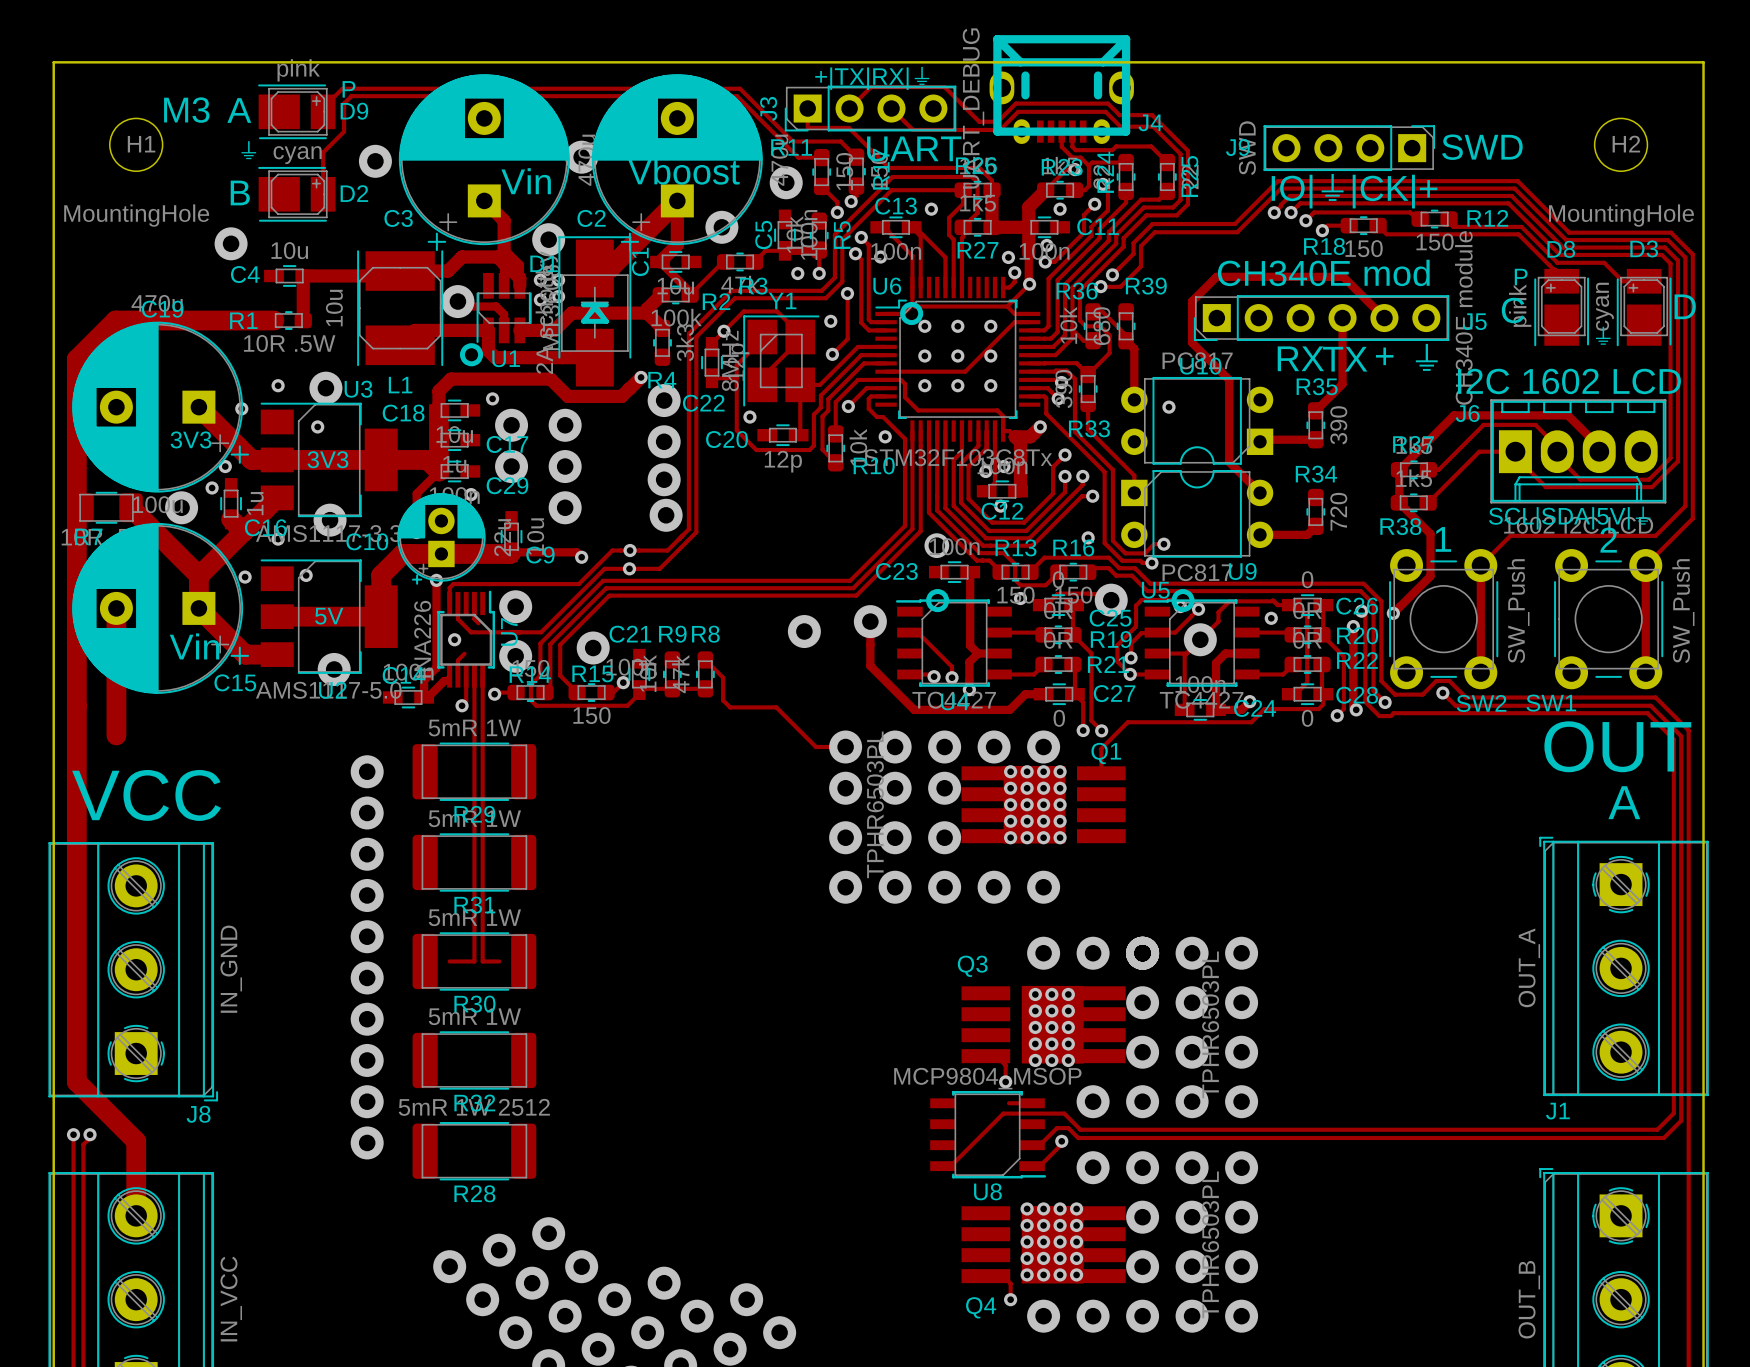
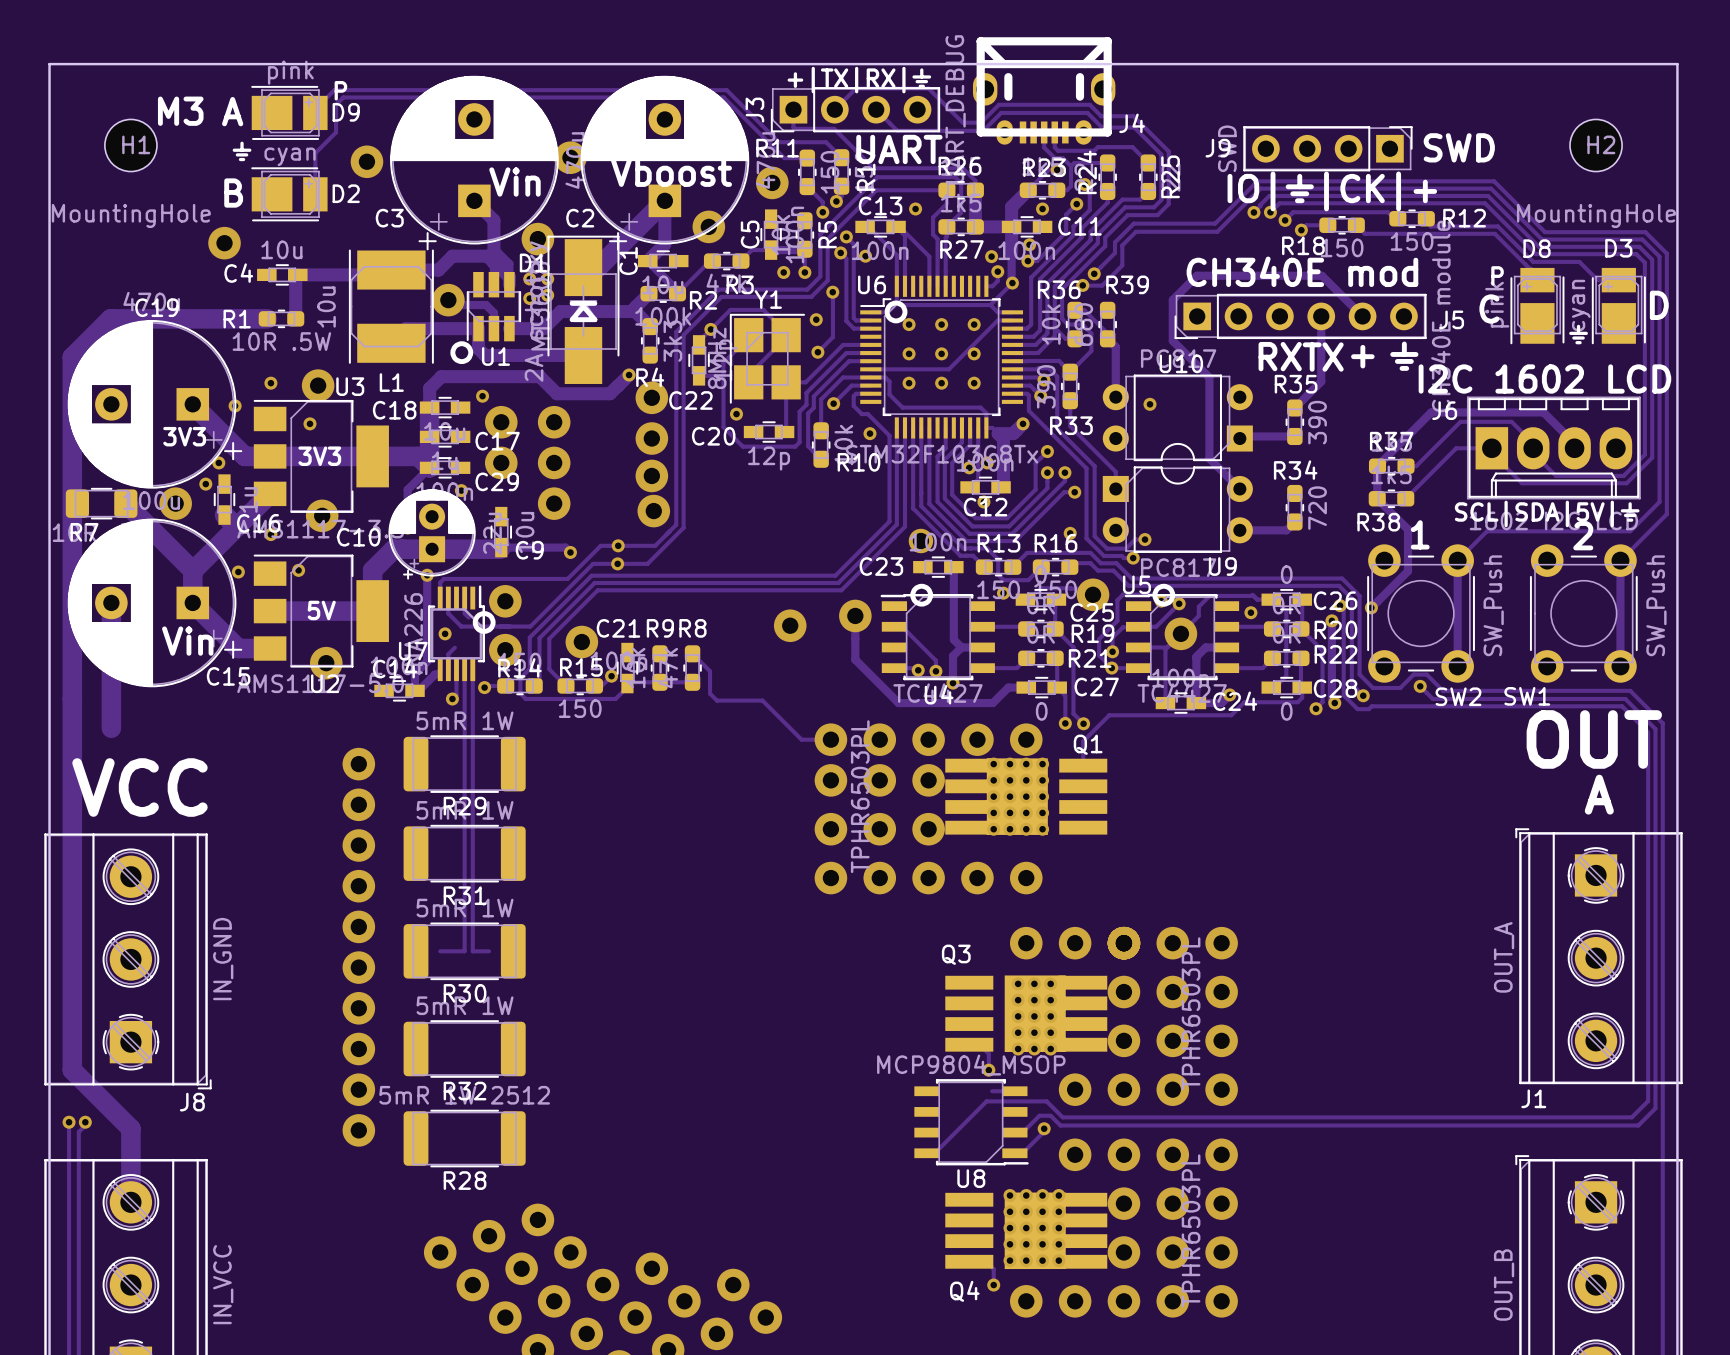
drawing: none -> [472, 611, 496, 634]
U7 name rotation: 0° (509, 632) -> 90° clockwise (413, 651)
U7 name position: U7 (509, 632) -> U7 (413, 651)

